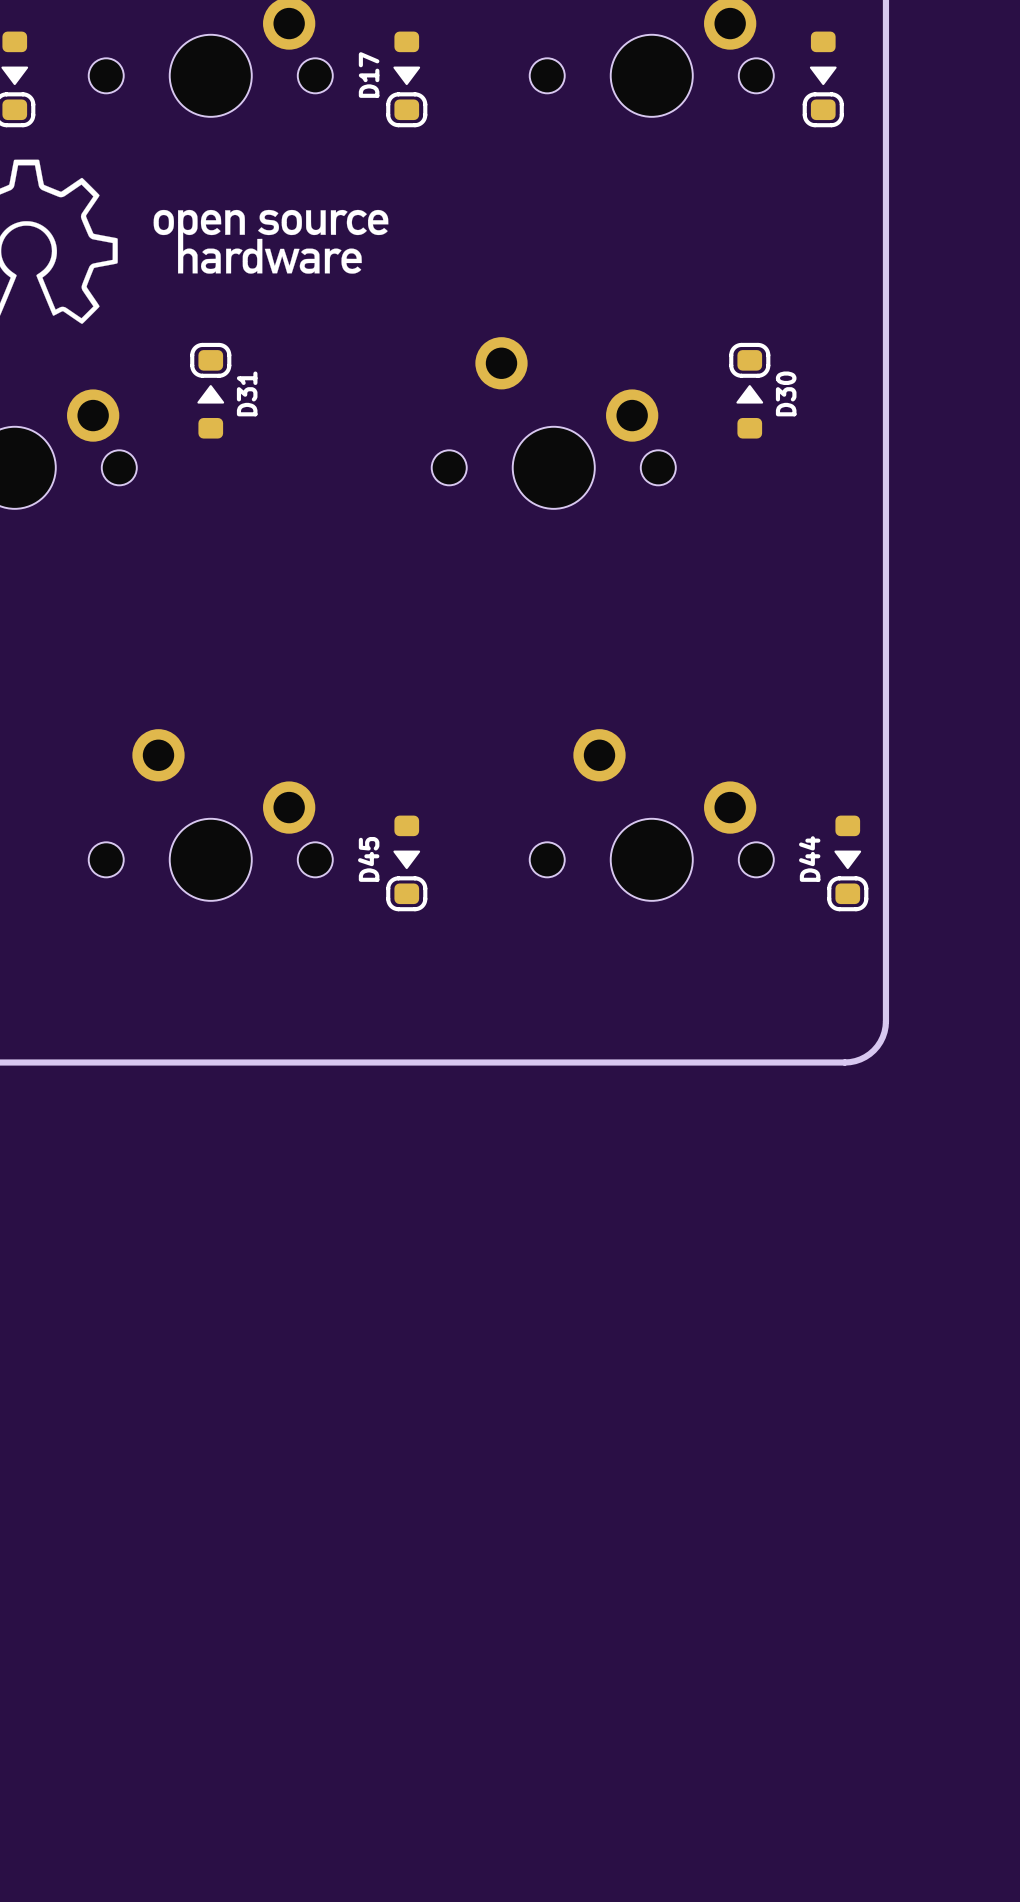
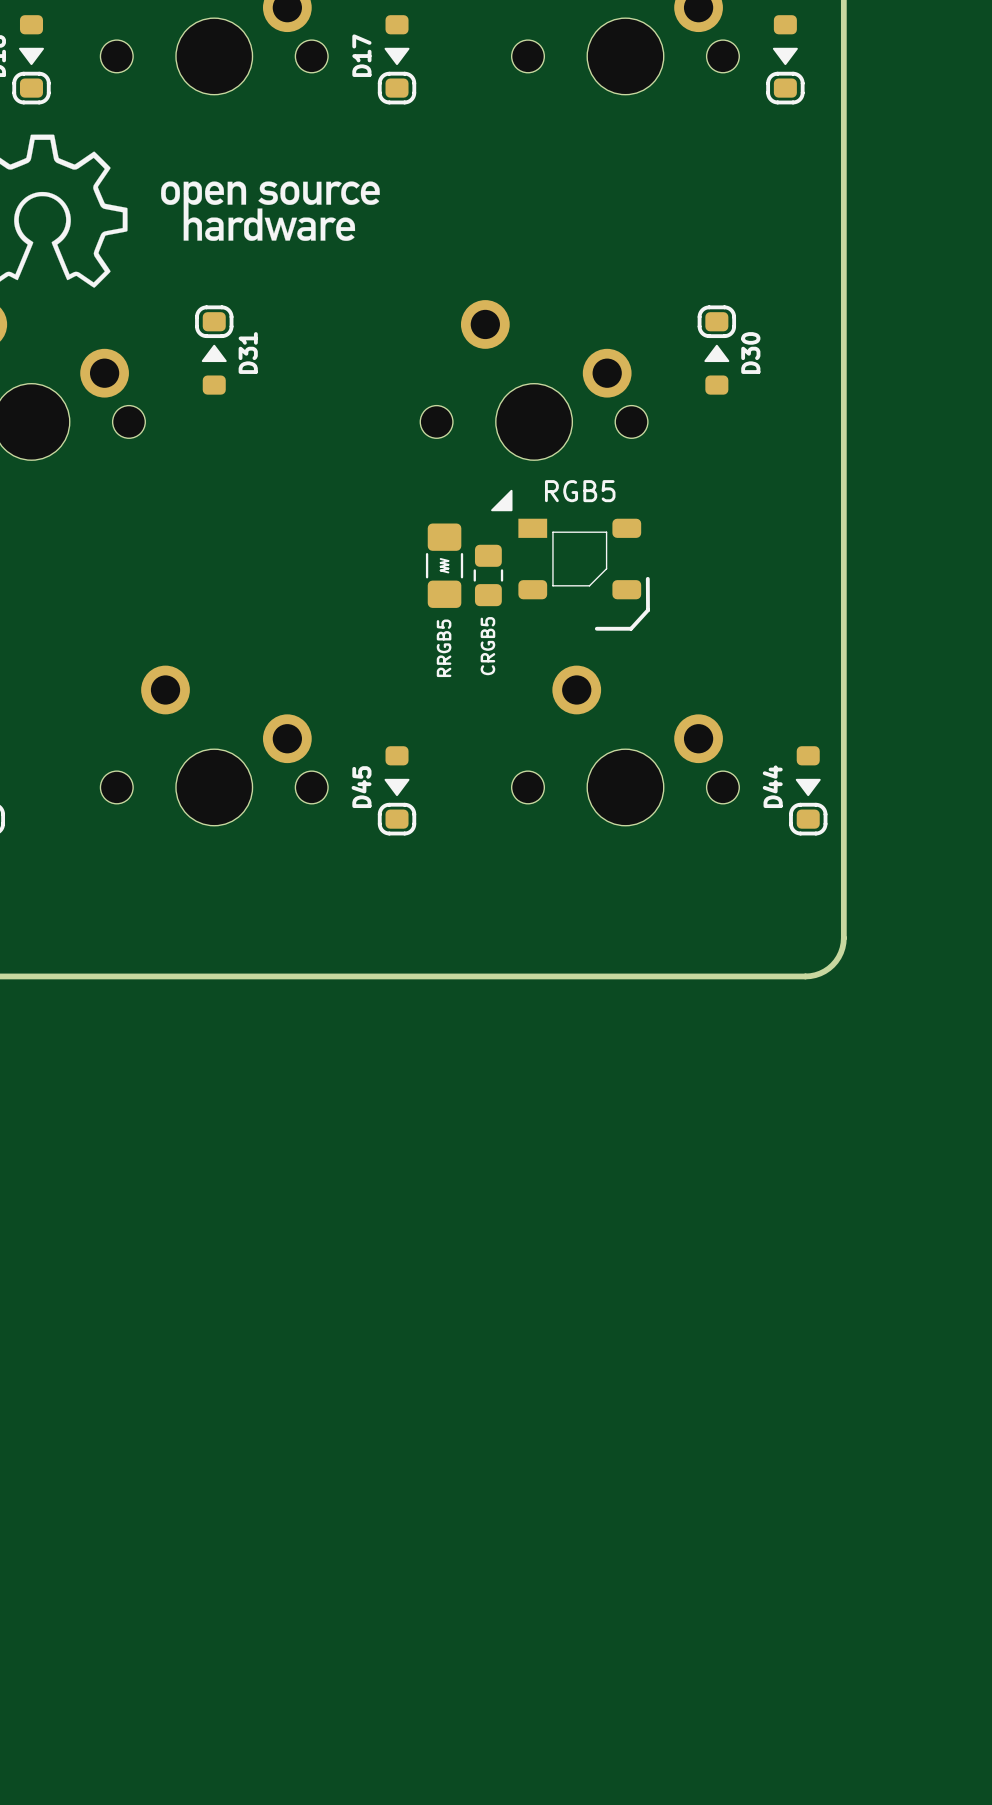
RGB5: none -> (570, 560)
RRGB5: none -> (444, 565)
CRGB5: none -> (488, 575)

